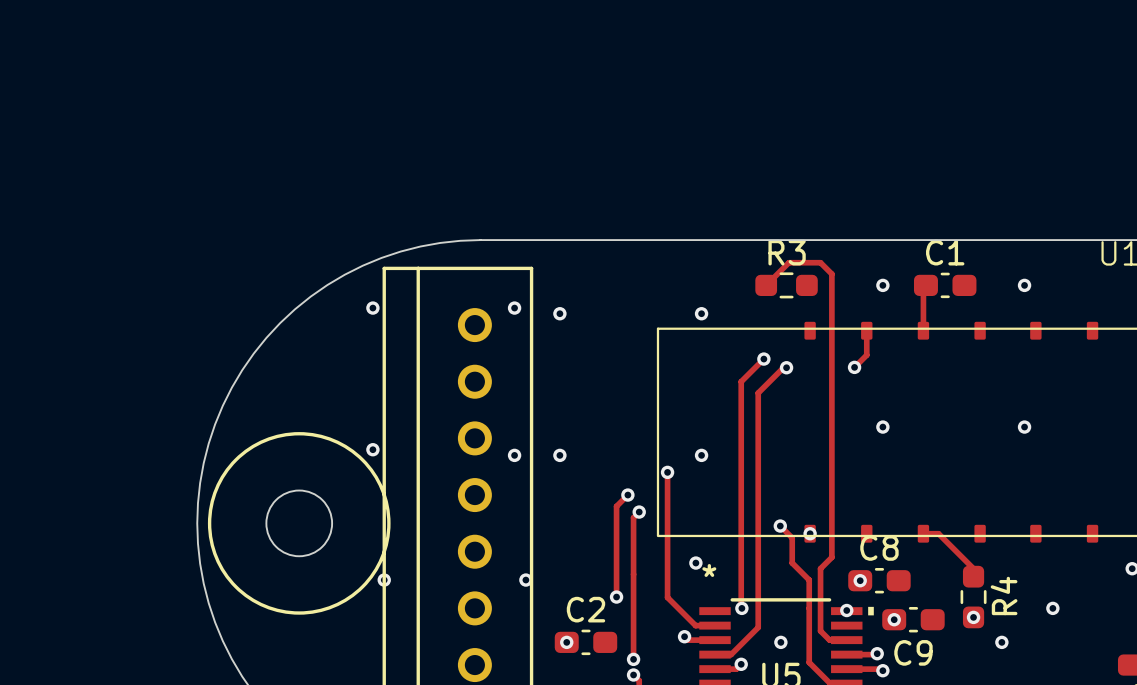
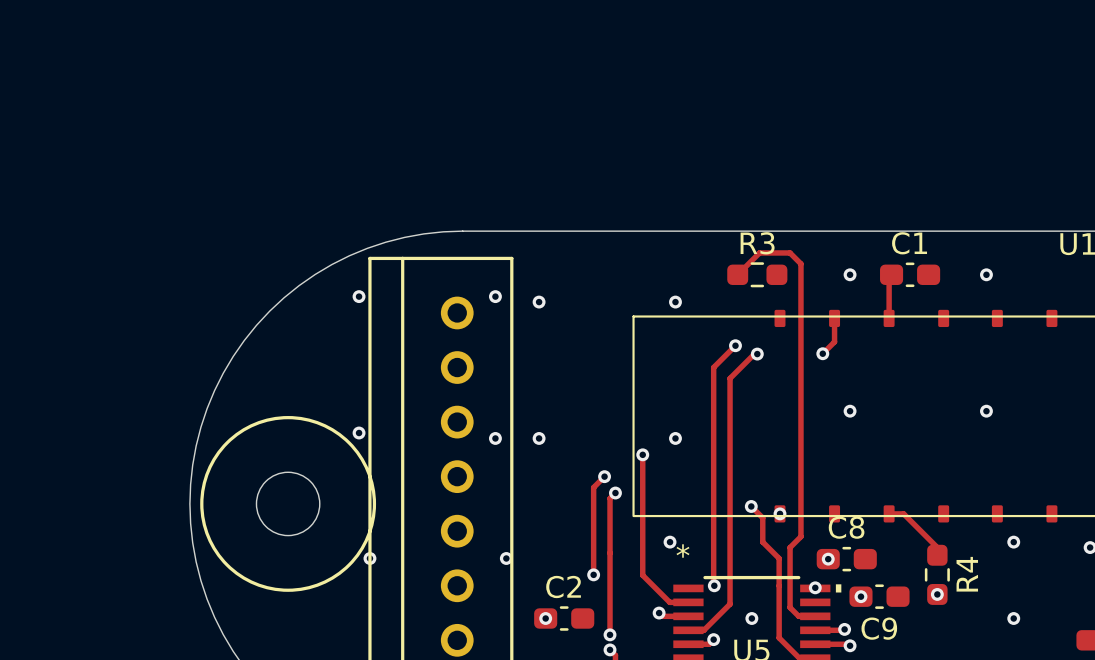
via: none -> (1013, 542)
via: (1052, 608) -> none
via: (1001, 642) -> none
via: none -> (1013, 618)

